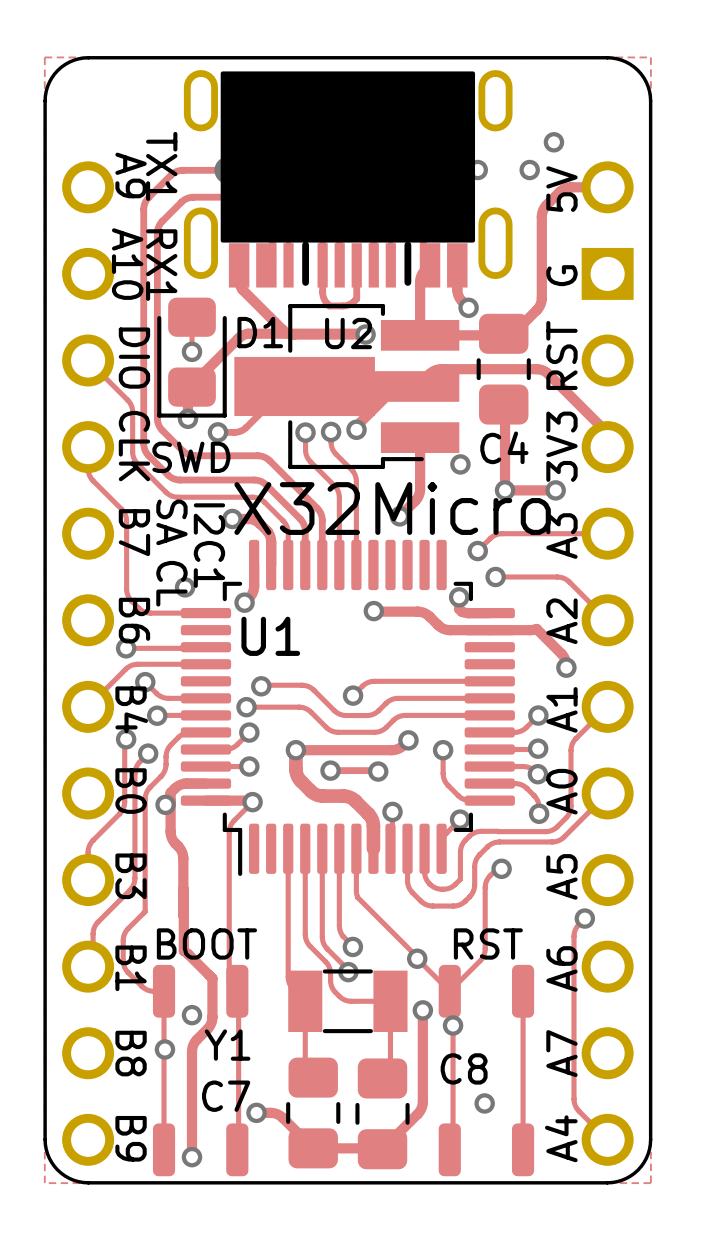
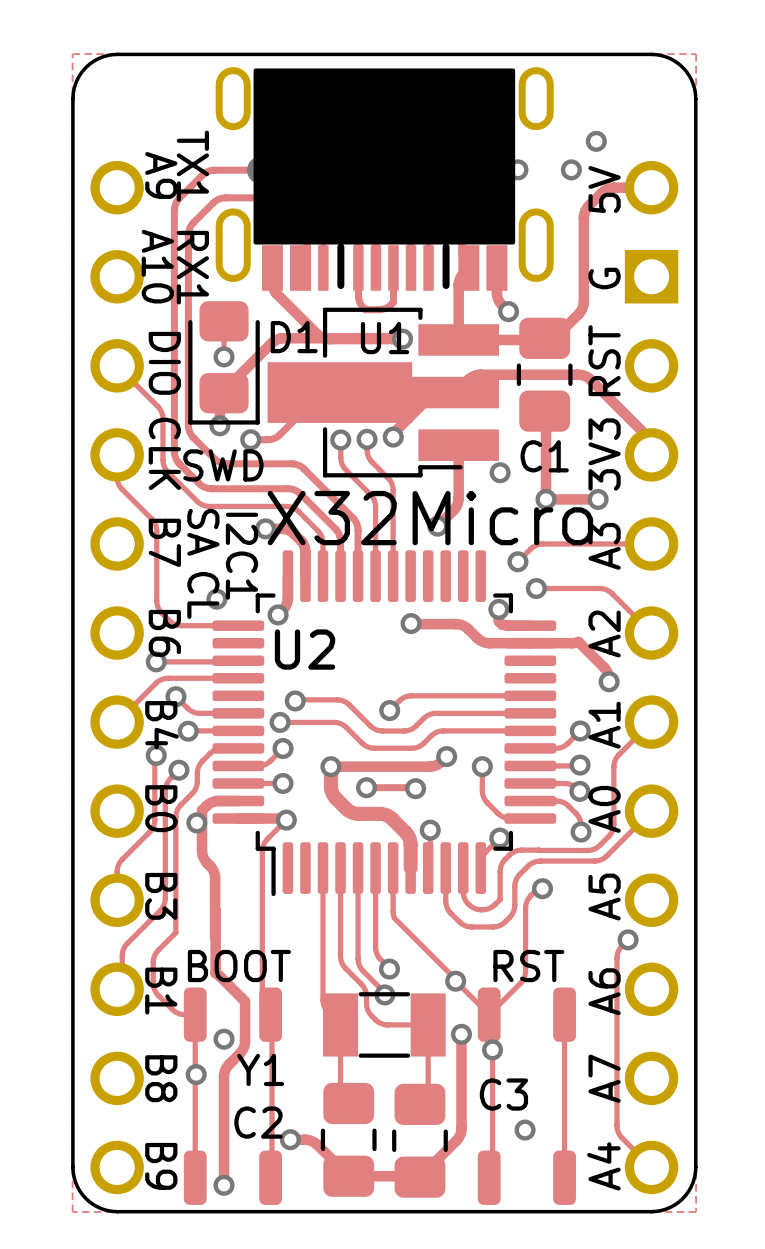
U2 name: U2 (348, 333) -> U1 (385, 338)
C4 name: C4 (504, 447) -> C1 (544, 456)
U1 name: U1 (270, 636) -> U2 (305, 649)
C8 name: C8 (464, 1068) -> C3 (503, 1094)
C7 name: C7 (226, 1096) -> C2 (258, 1122)

